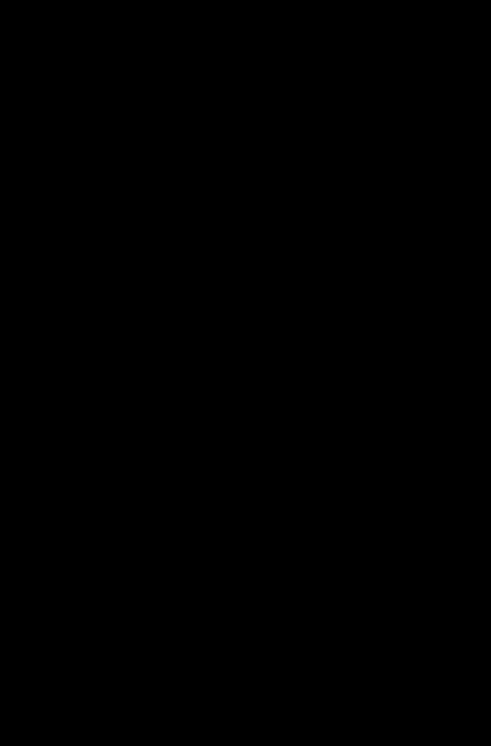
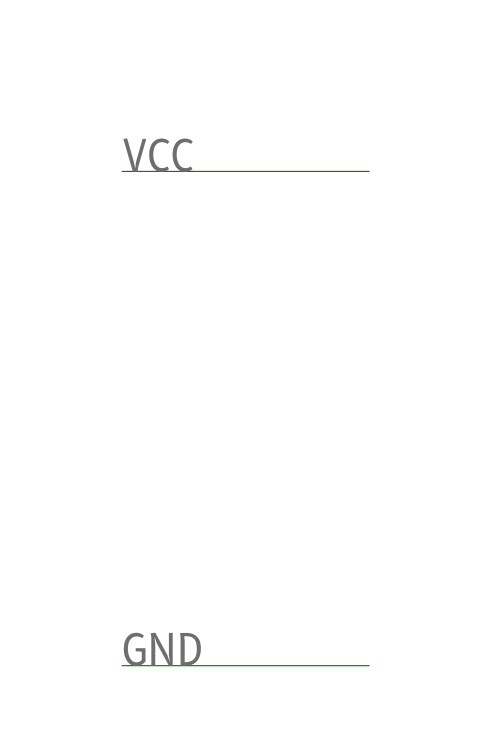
label: none -> VCC (158, 155)
wire: none -> (122, 171) (369, 171)
label: none -> GND (162, 649)
wire: none -> (122, 665) (369, 665)

